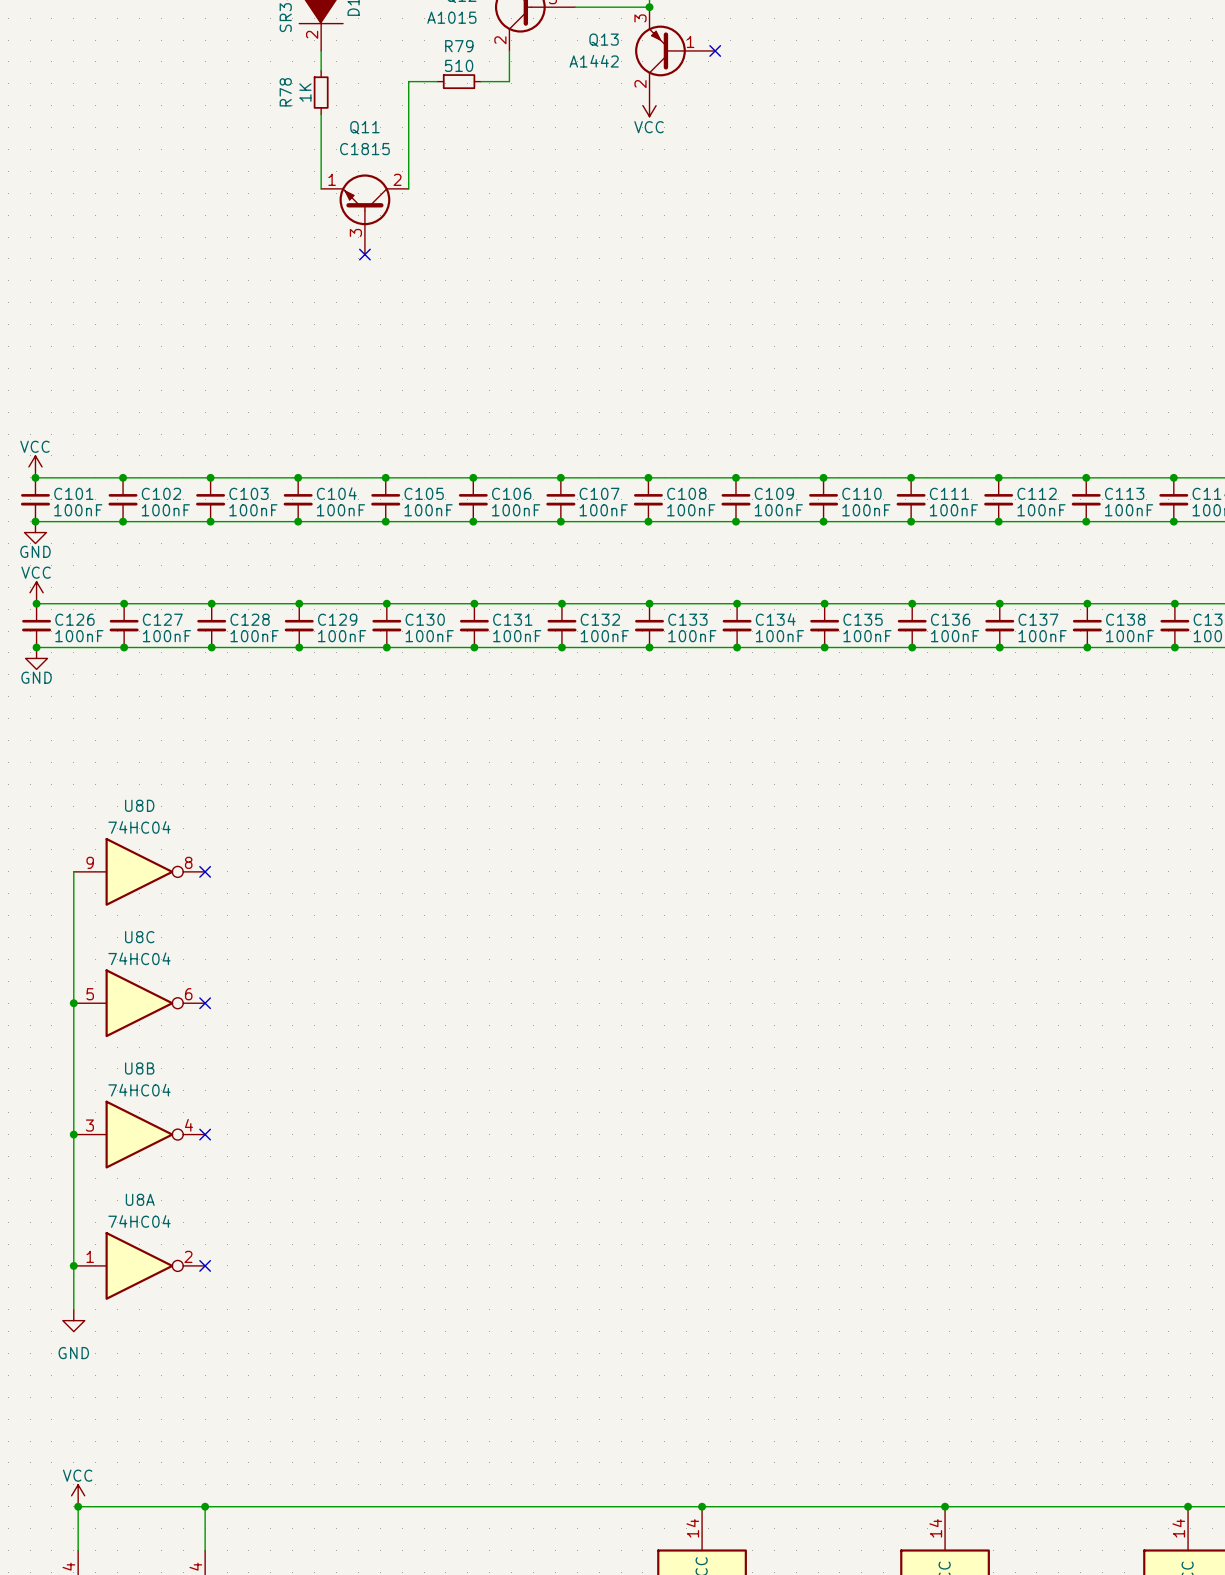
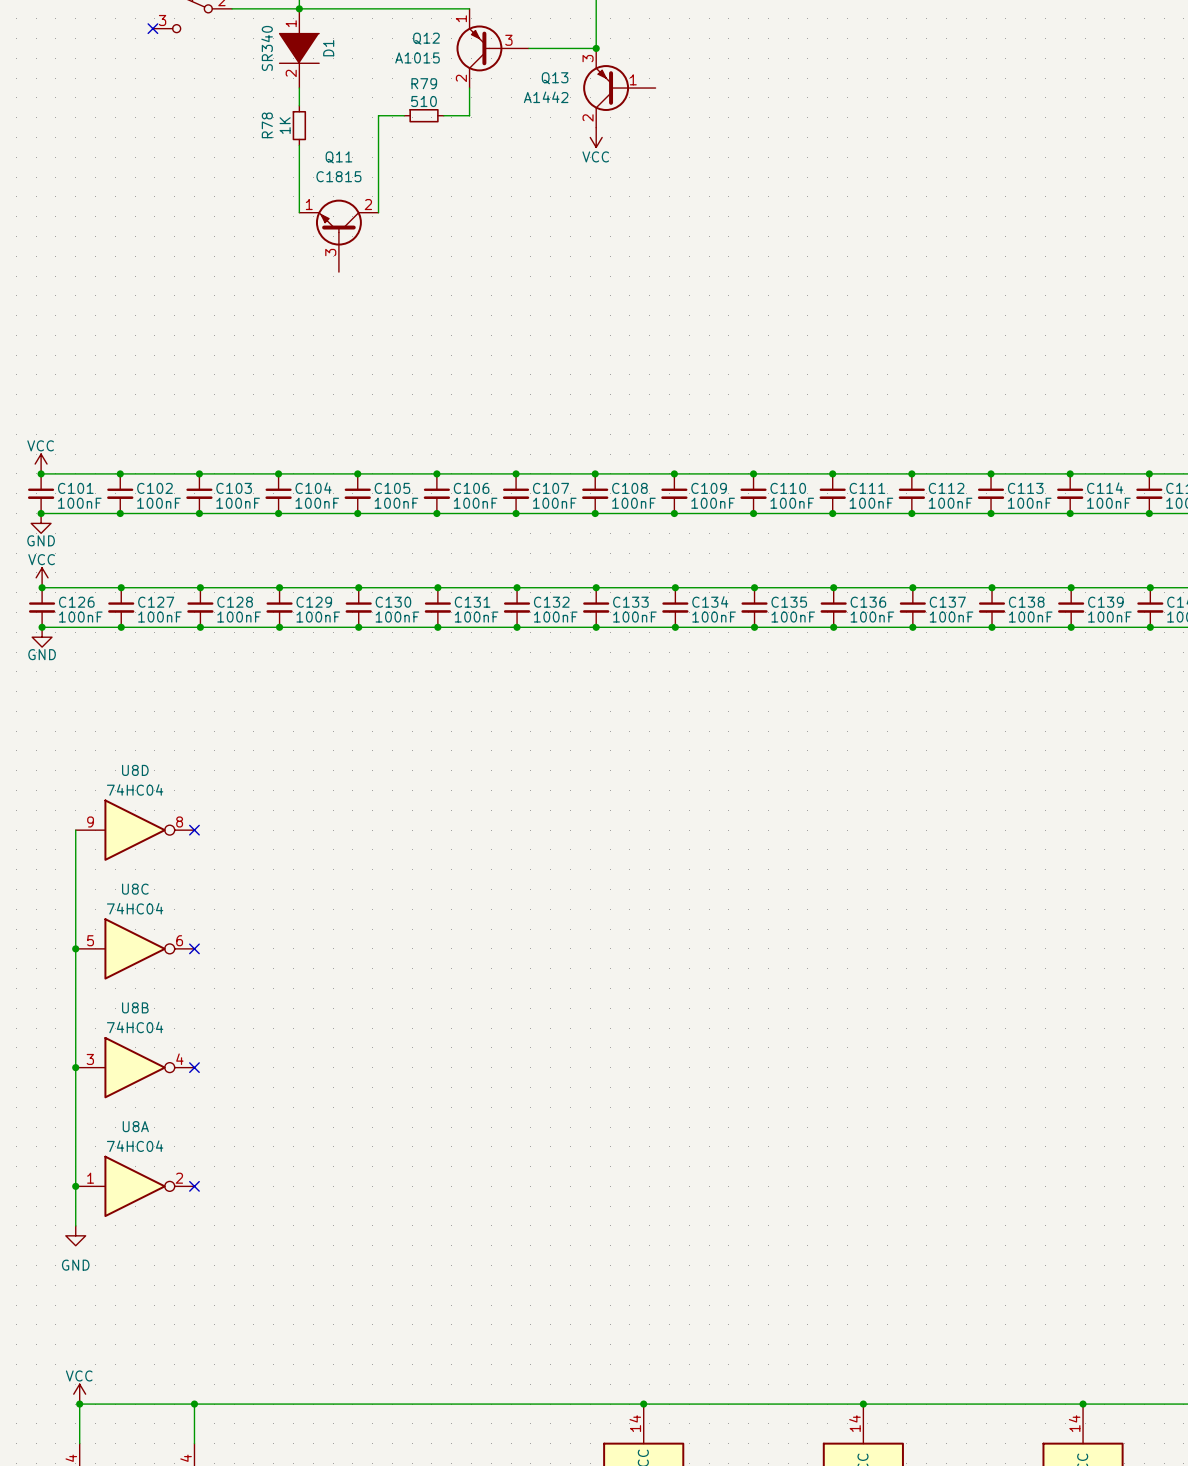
no-connect mark: (715, 50) -> none
no-connect mark: (364, 254) -> none

